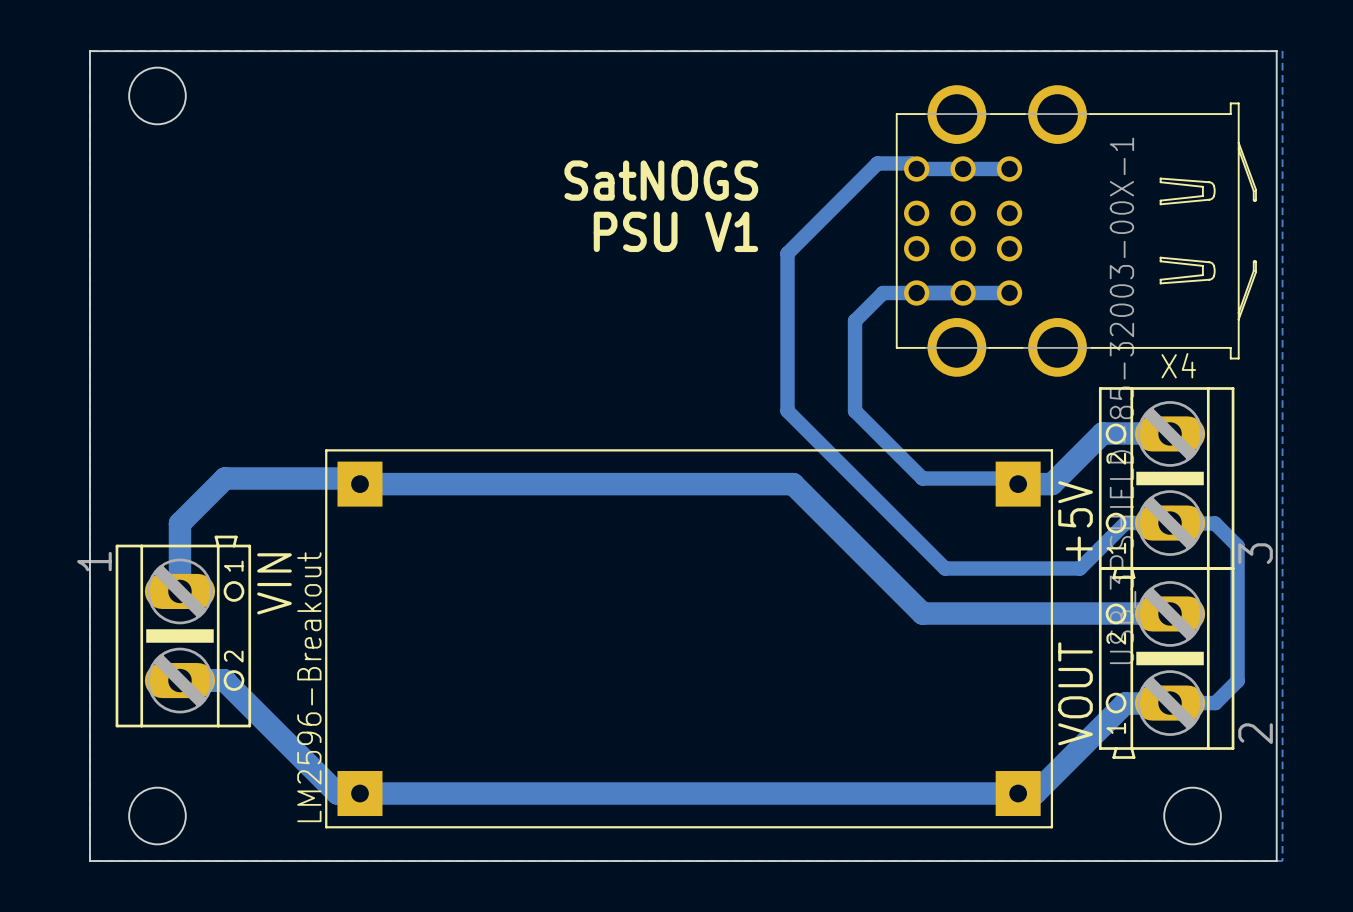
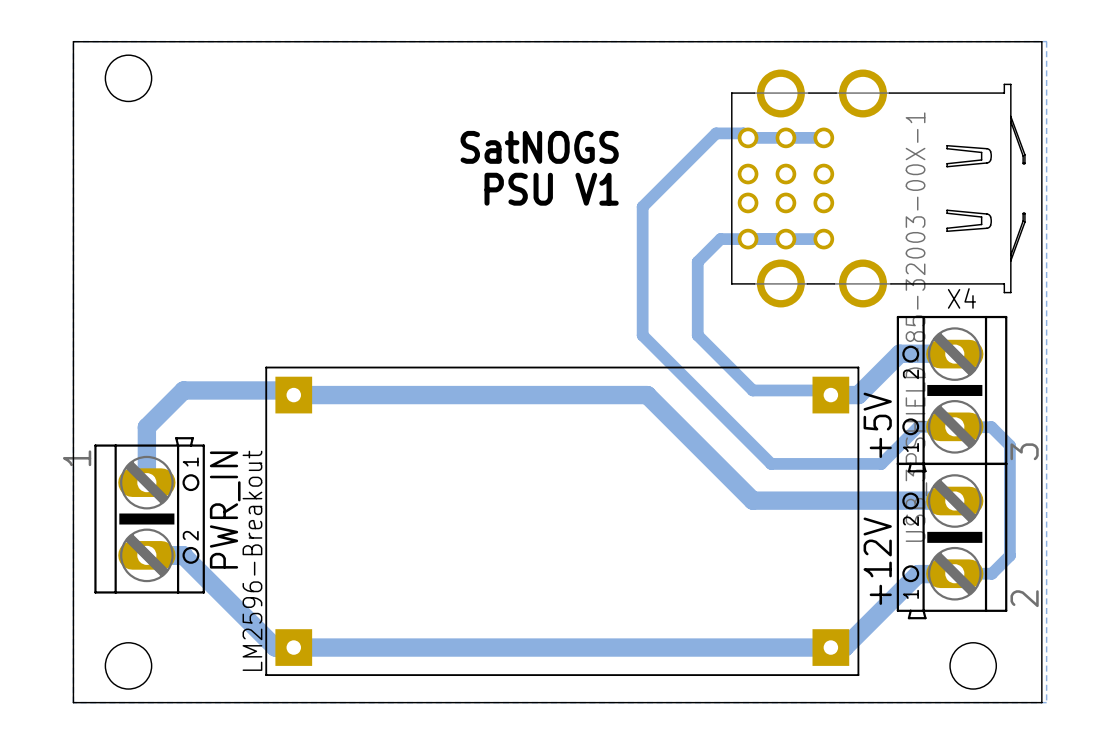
VIN name: VIN (274, 583) -> PWR_IN (225, 510)
VOUT name: VOUT (1075, 693) -> +12V (877, 561)

